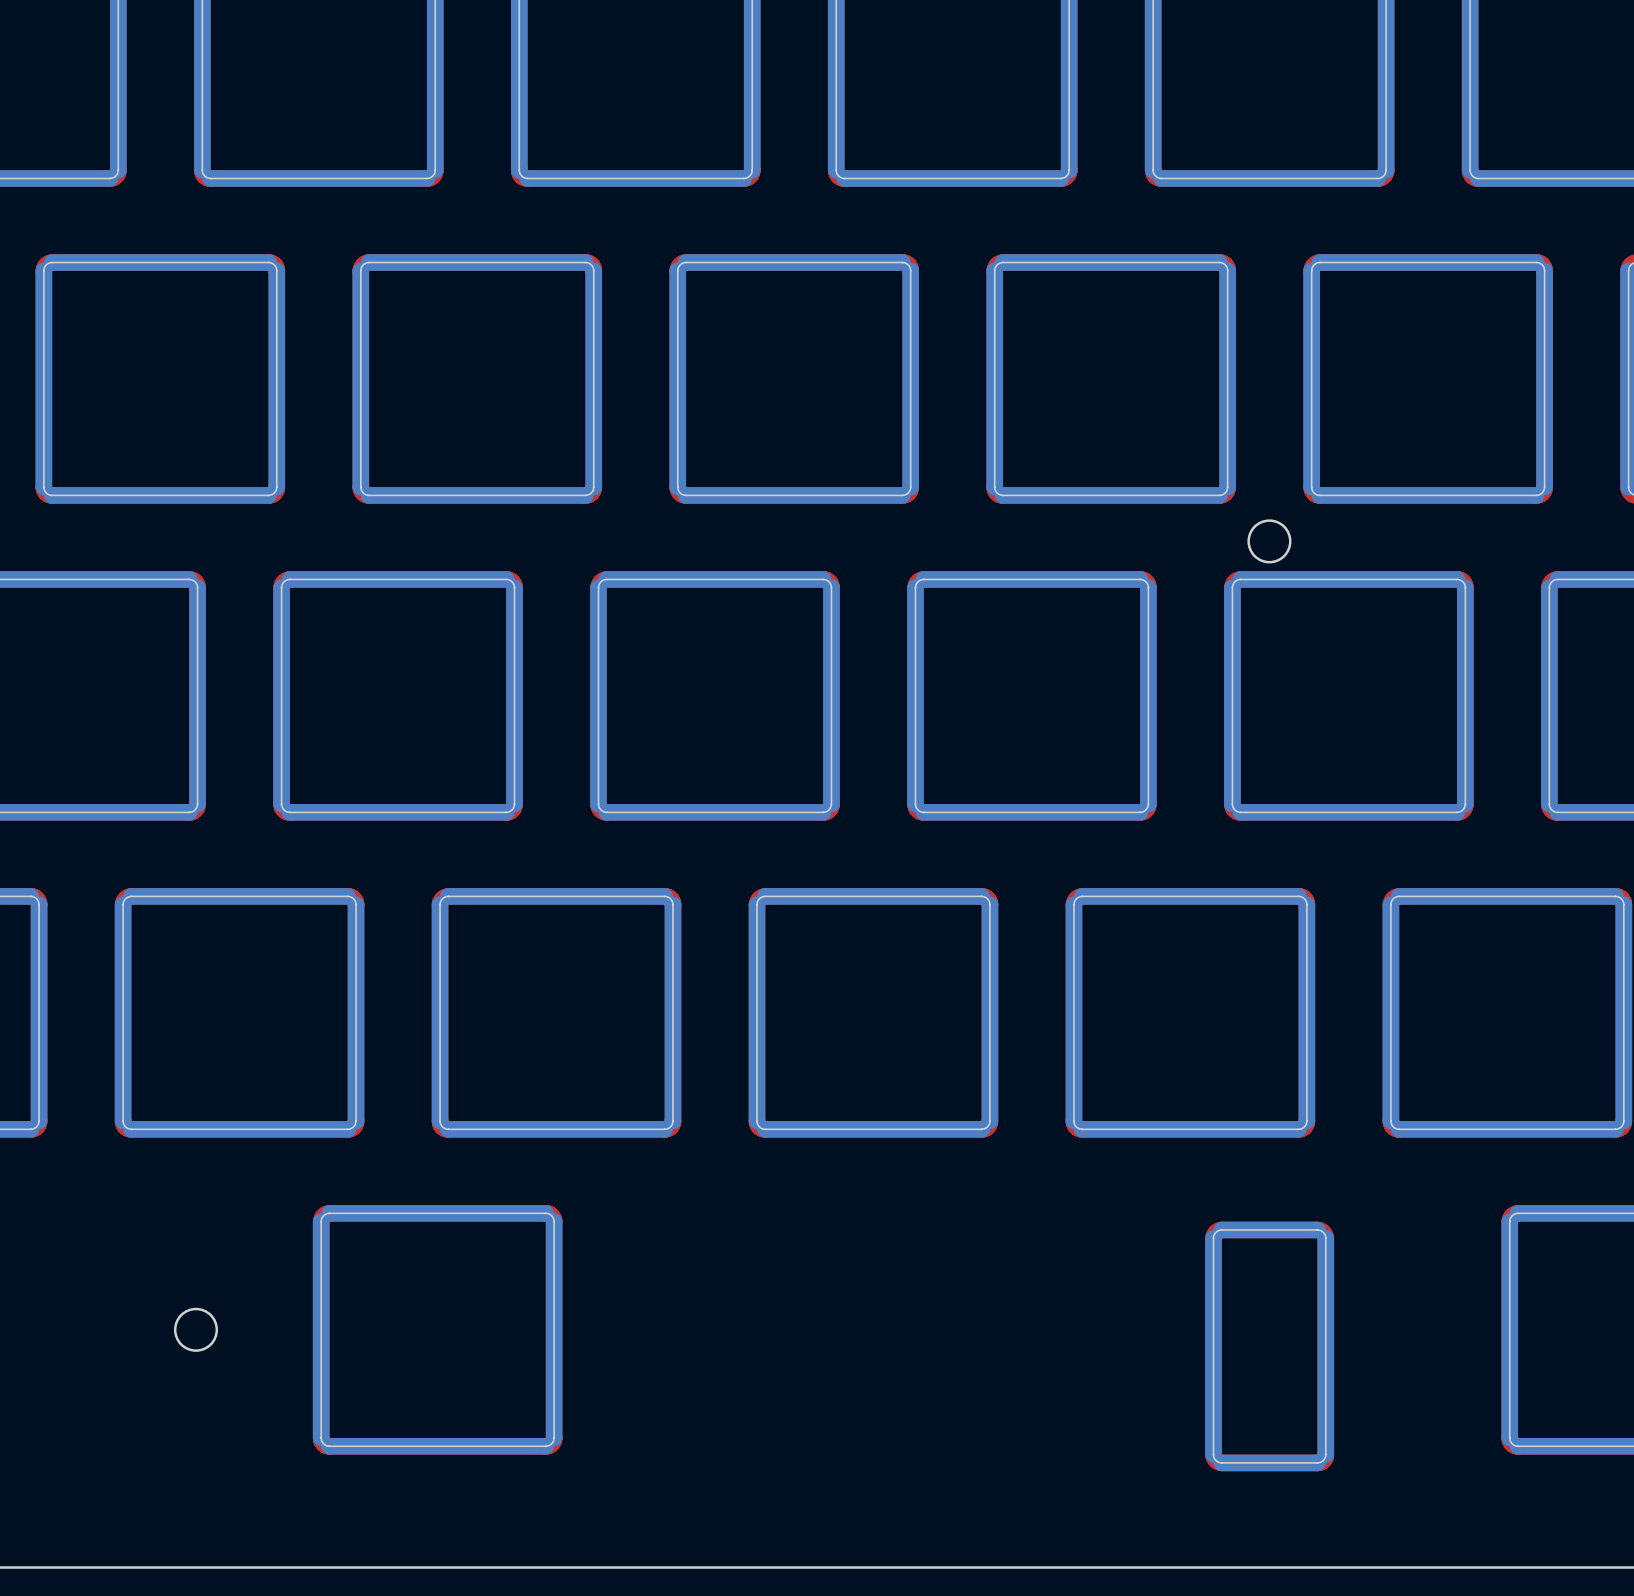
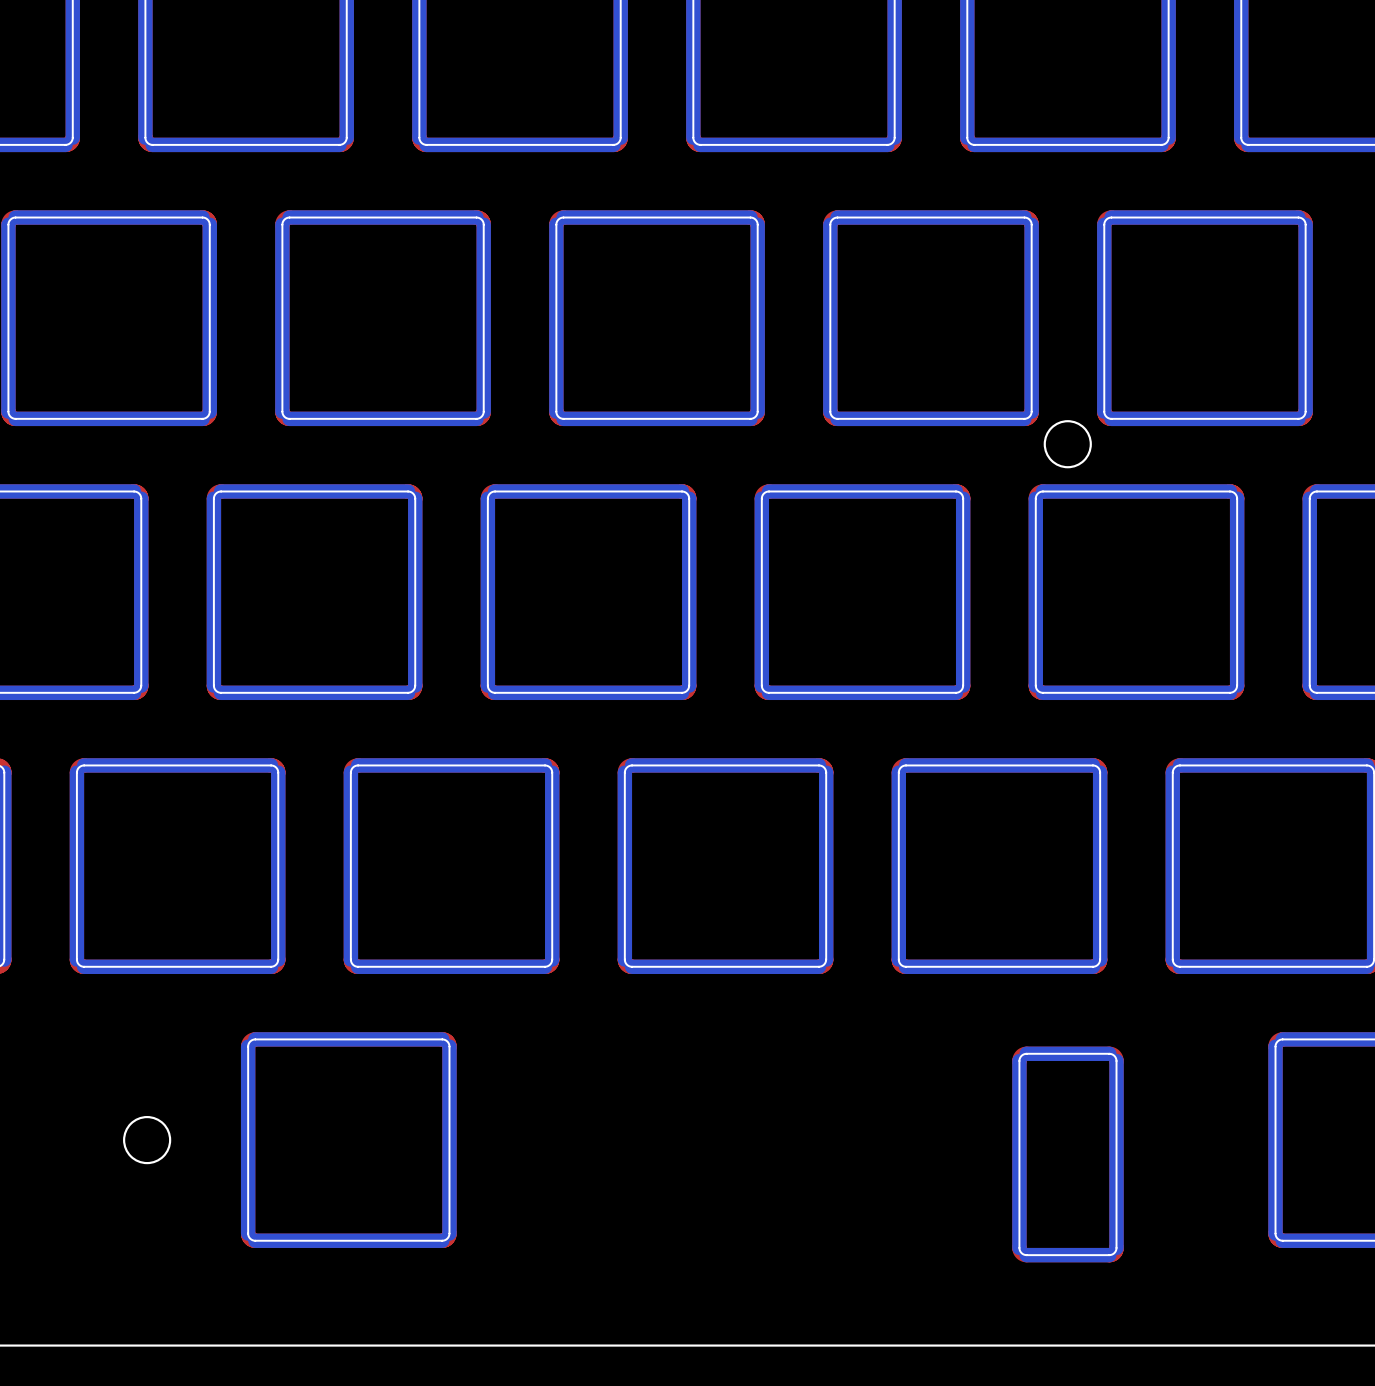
round board edge size: [1247, 519, 1292, 564] -> [1043, 420, 1092, 469]
round board edge size: [173, 1307, 219, 1352] -> [123, 1115, 172, 1165]

